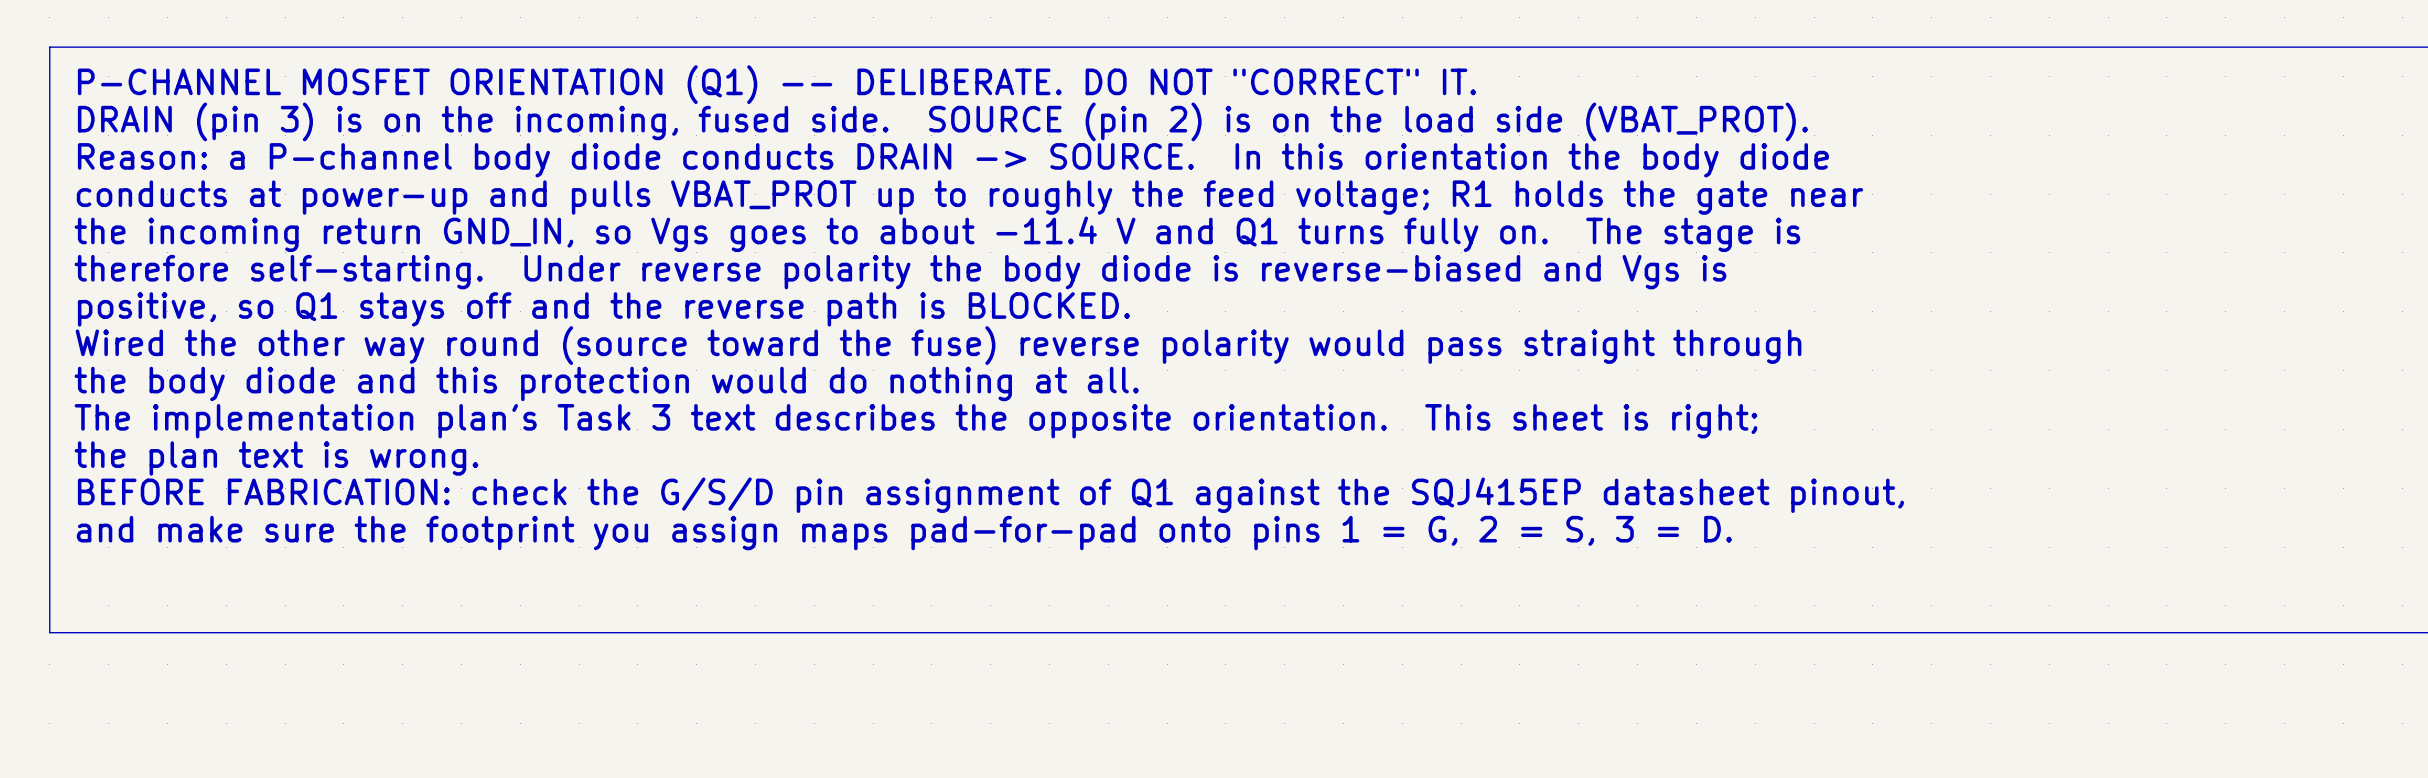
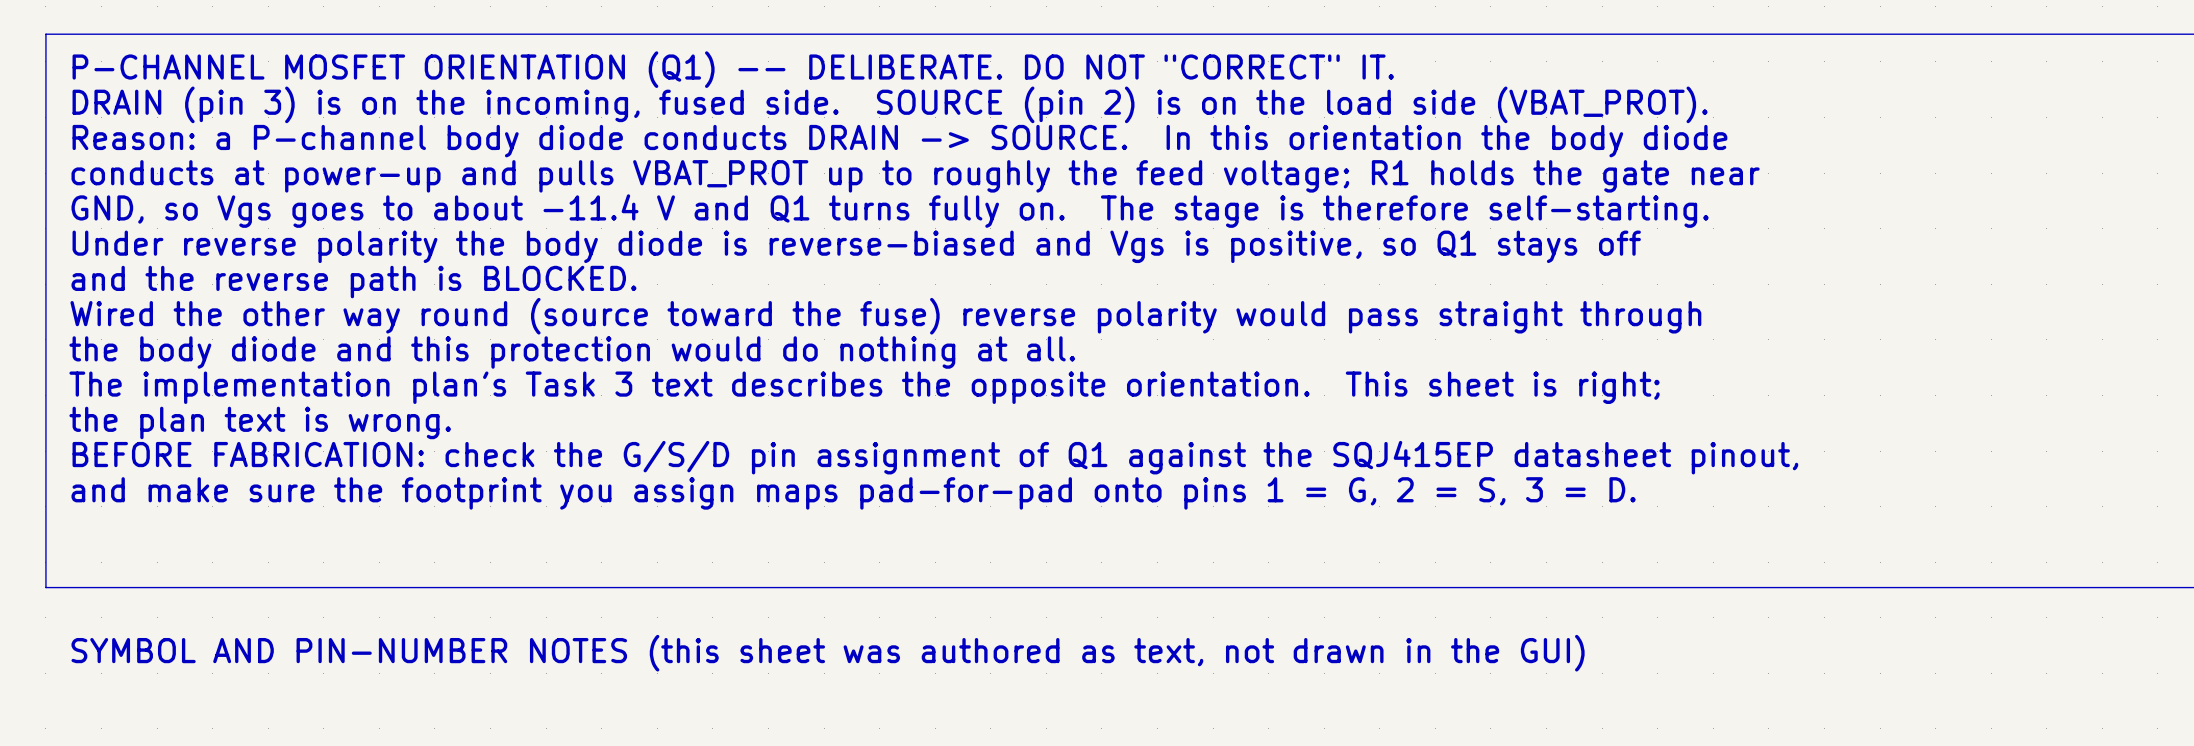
text: the incoming return GND_IN, so Vgs goes to about -11.4 V and Q1 turns fully on. The stage is (937, 234) -> GND, so Vgs goes to about -11.4 V and Q1 turns fully on. The stage is therefore self-starting. (890, 211)
text: therefore self-starting. Under reverse polarity the body diode is reverse-biased and Vgs is (900, 272) -> Under reverse polarity the body diode is reverse-biased and Vgs is positive, so Q1 stays off (856, 246)
text: positive, so Q1 stays off and the reverse path is BLOCKED. (603, 309) -> and the reverse path is BLOCKED. (353, 282)
text: none -> SYMBOL AND PIN-NUMBER NOTES (this sheet was authored as text, not drawn in the GUI) (828, 653)

